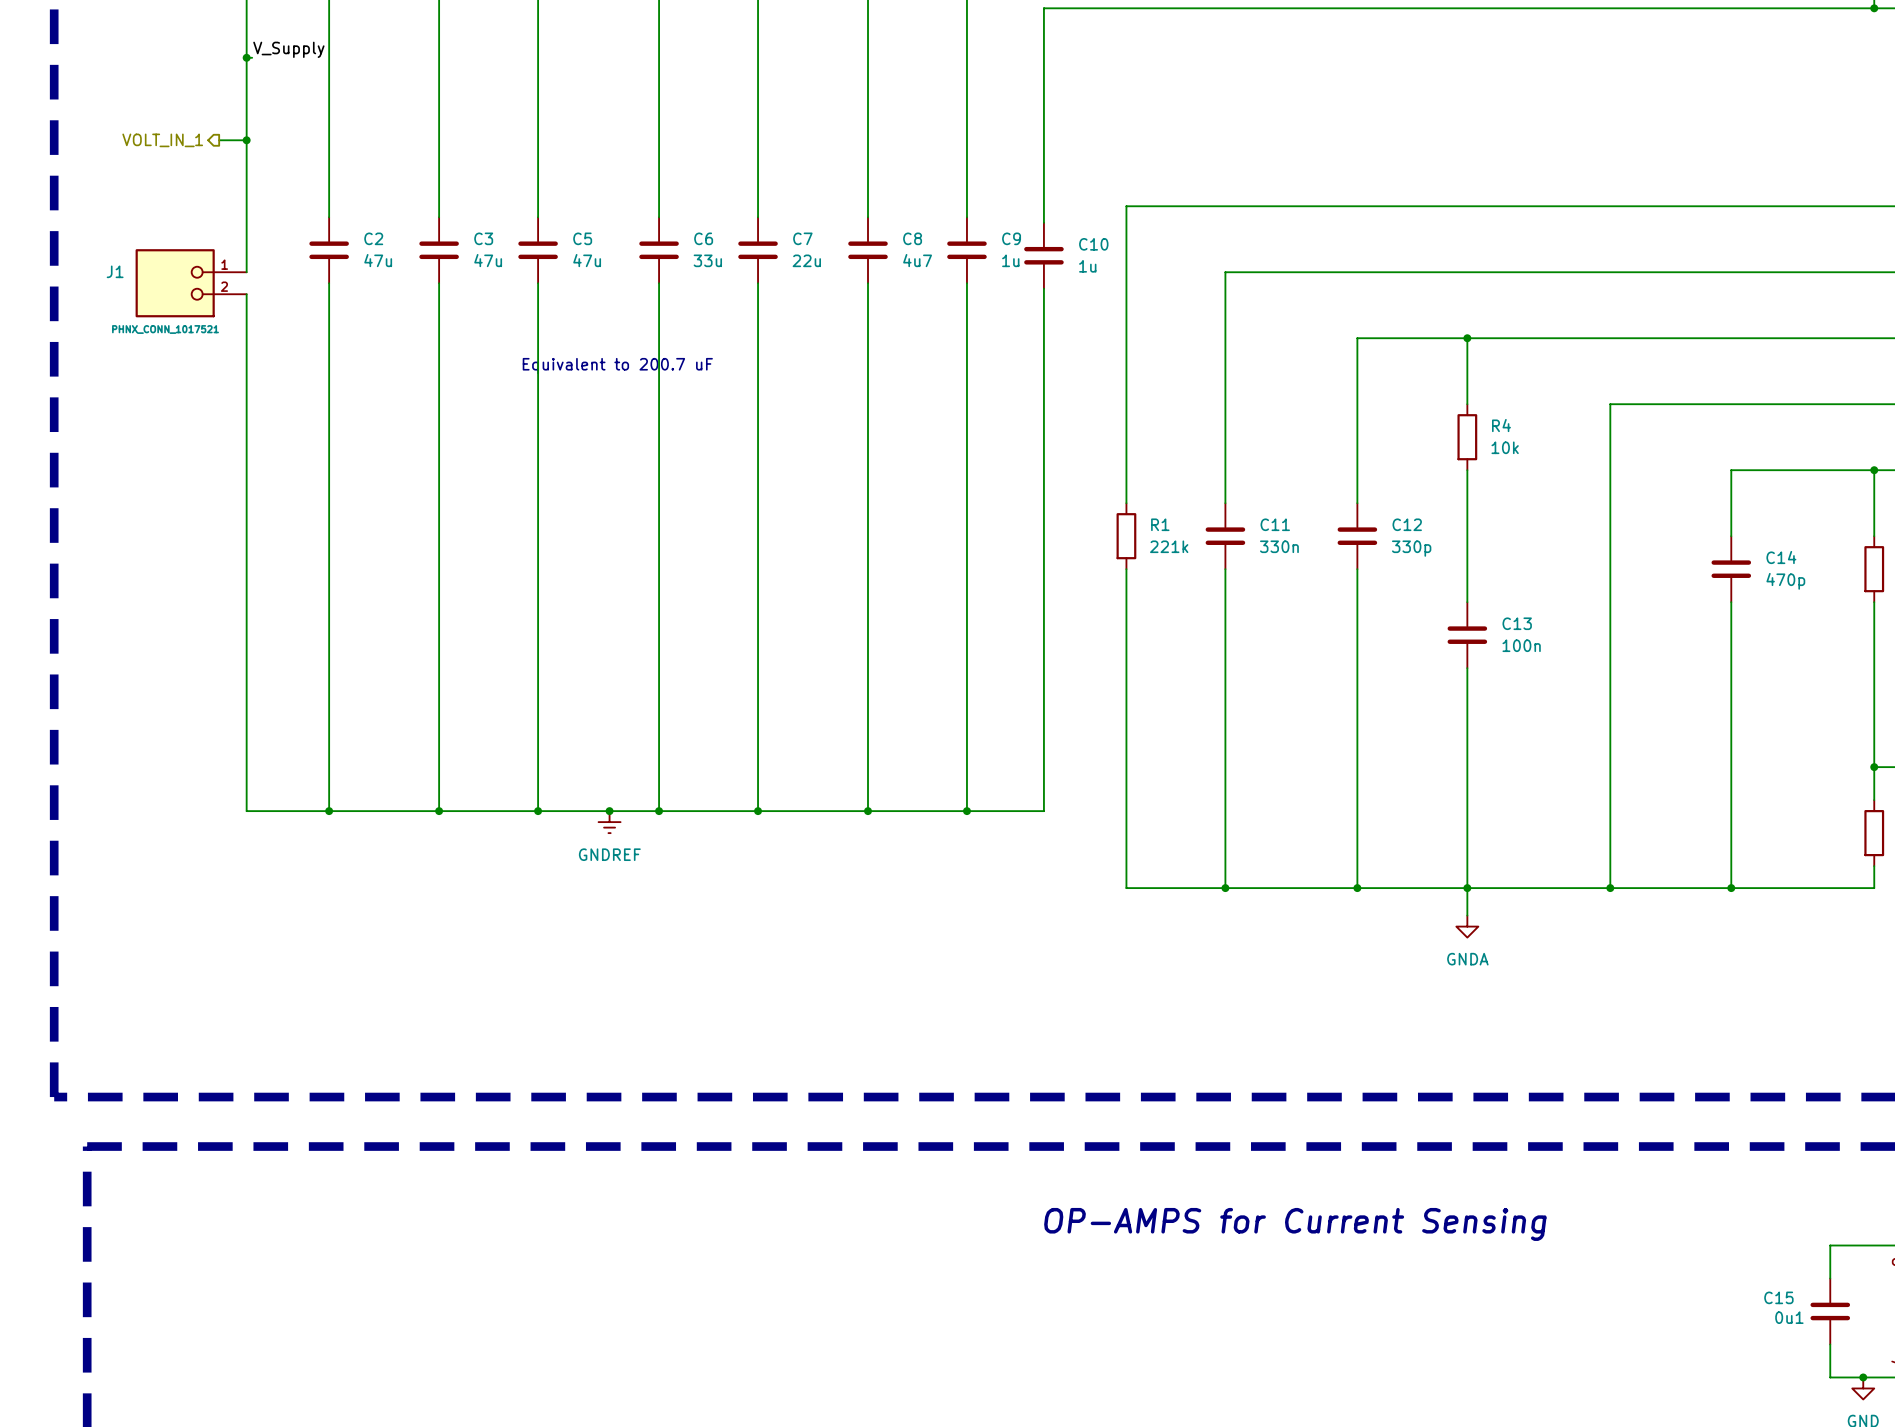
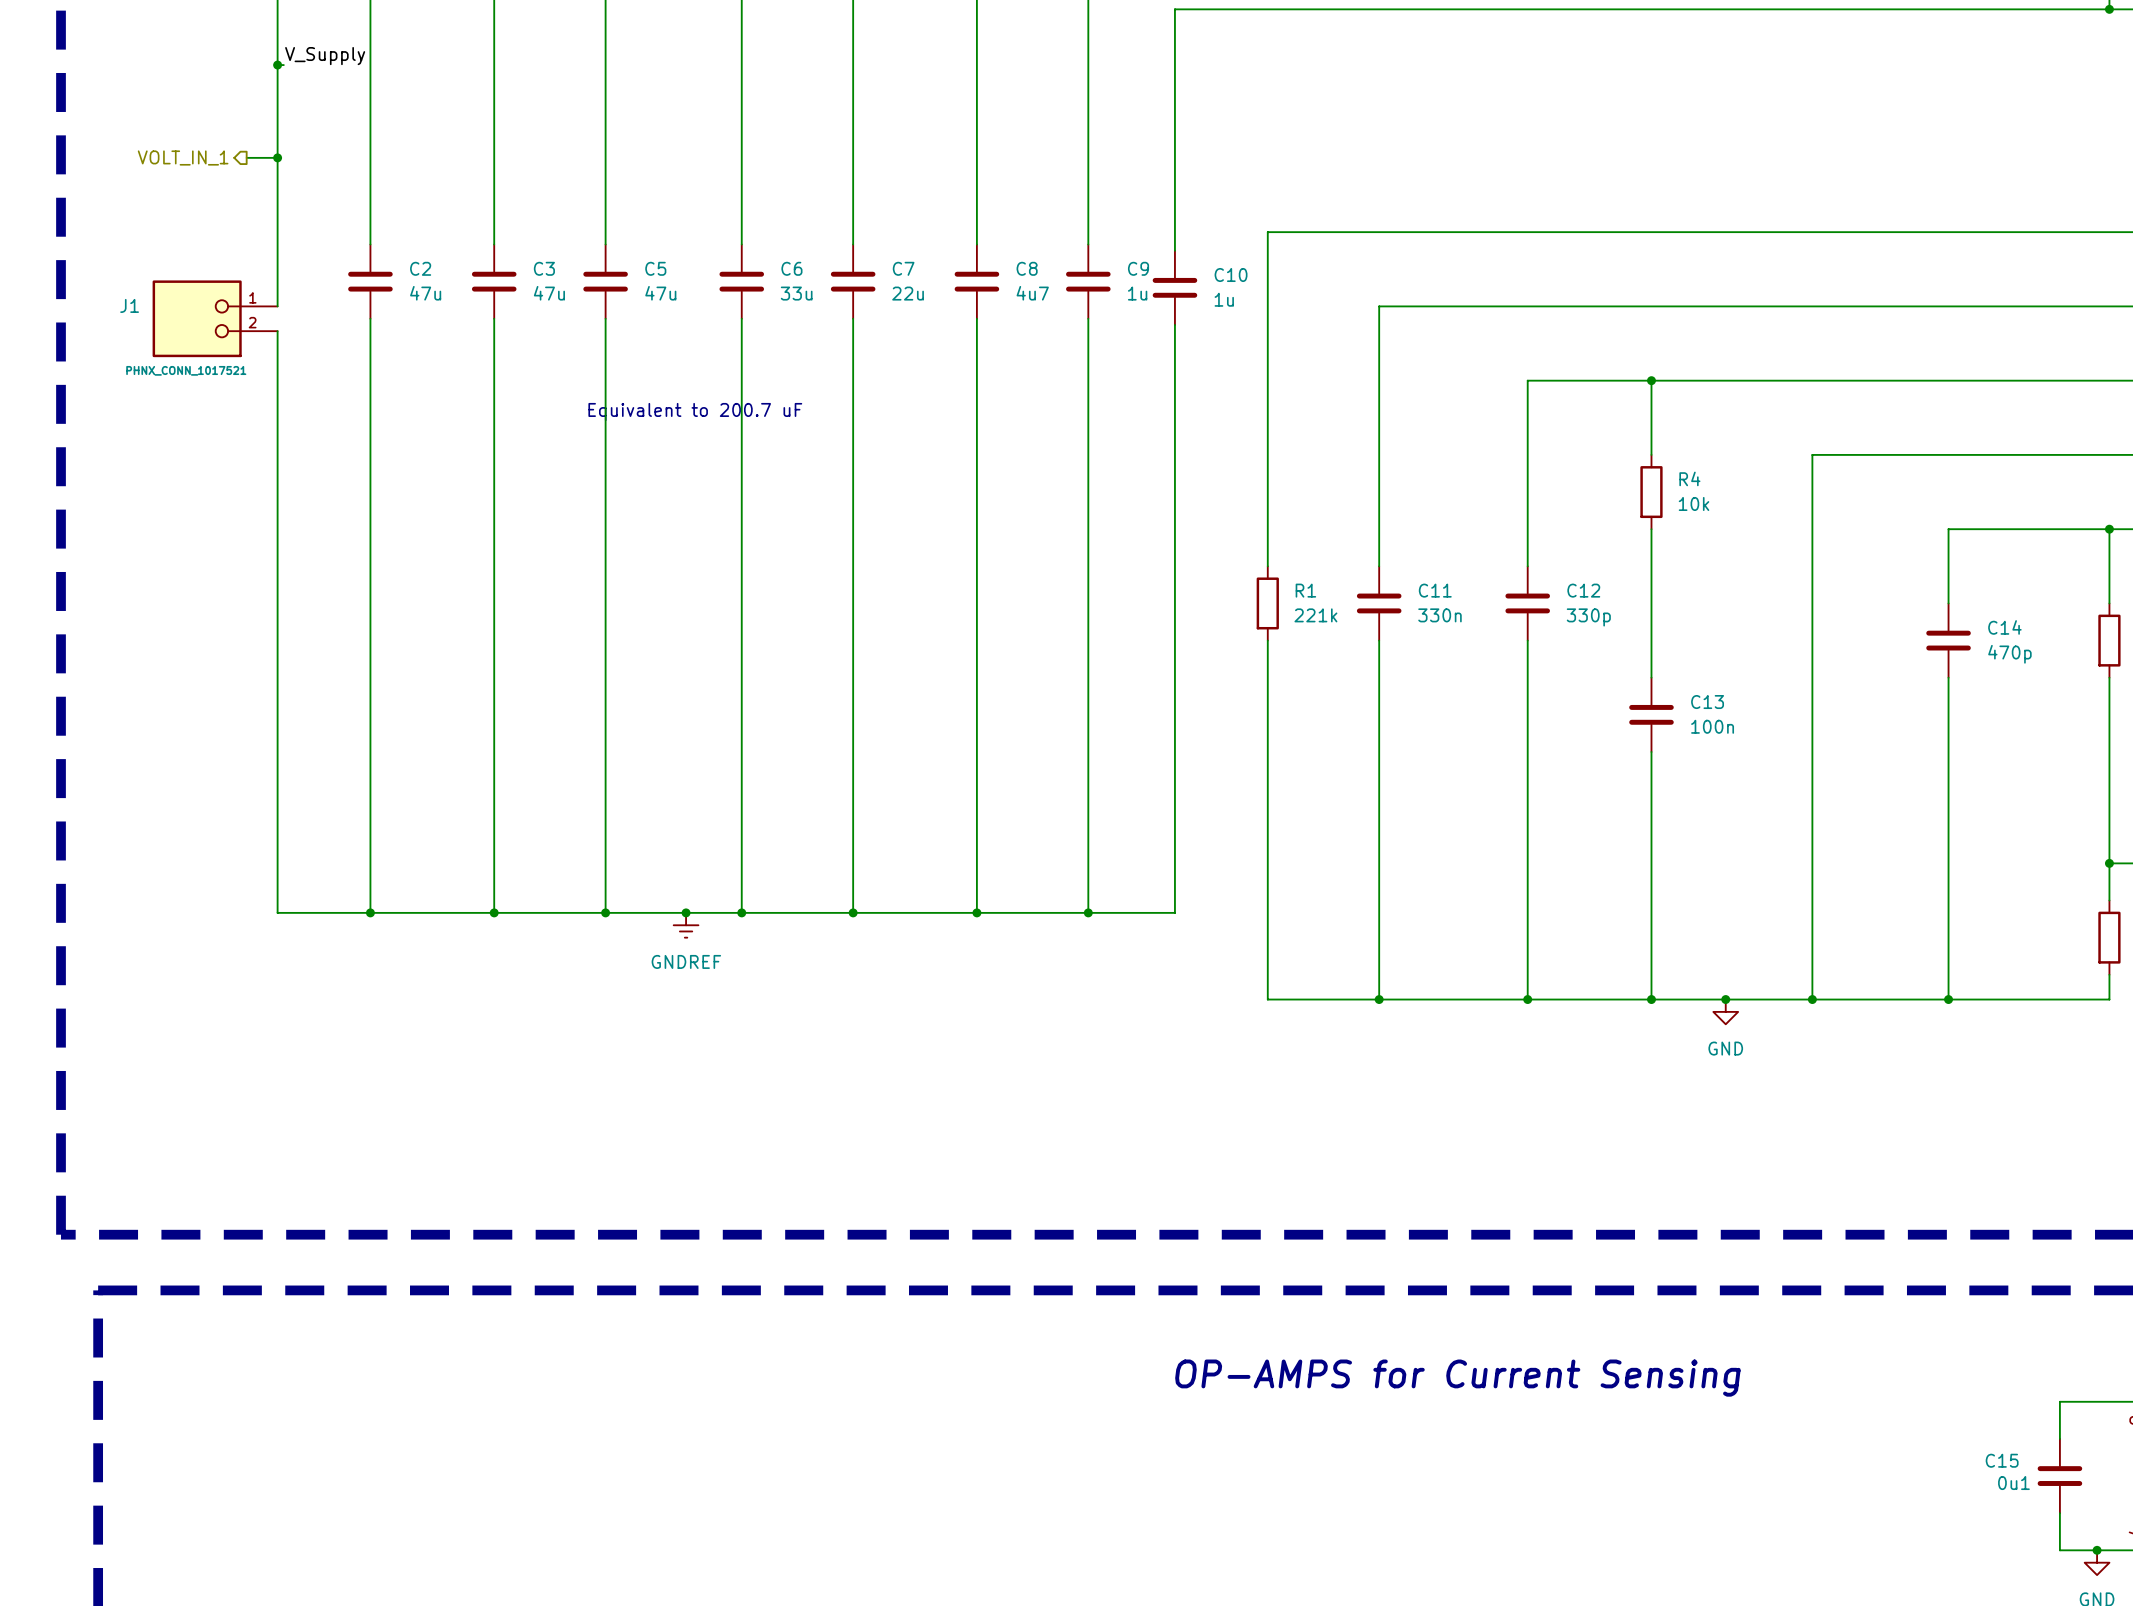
wire: (1467, 888) (1467, 915) -> none
junction: none -> (1725, 999)
power symbol: none -> GND (1725, 1011)
power symbol: GNDA (1467, 926) -> none

